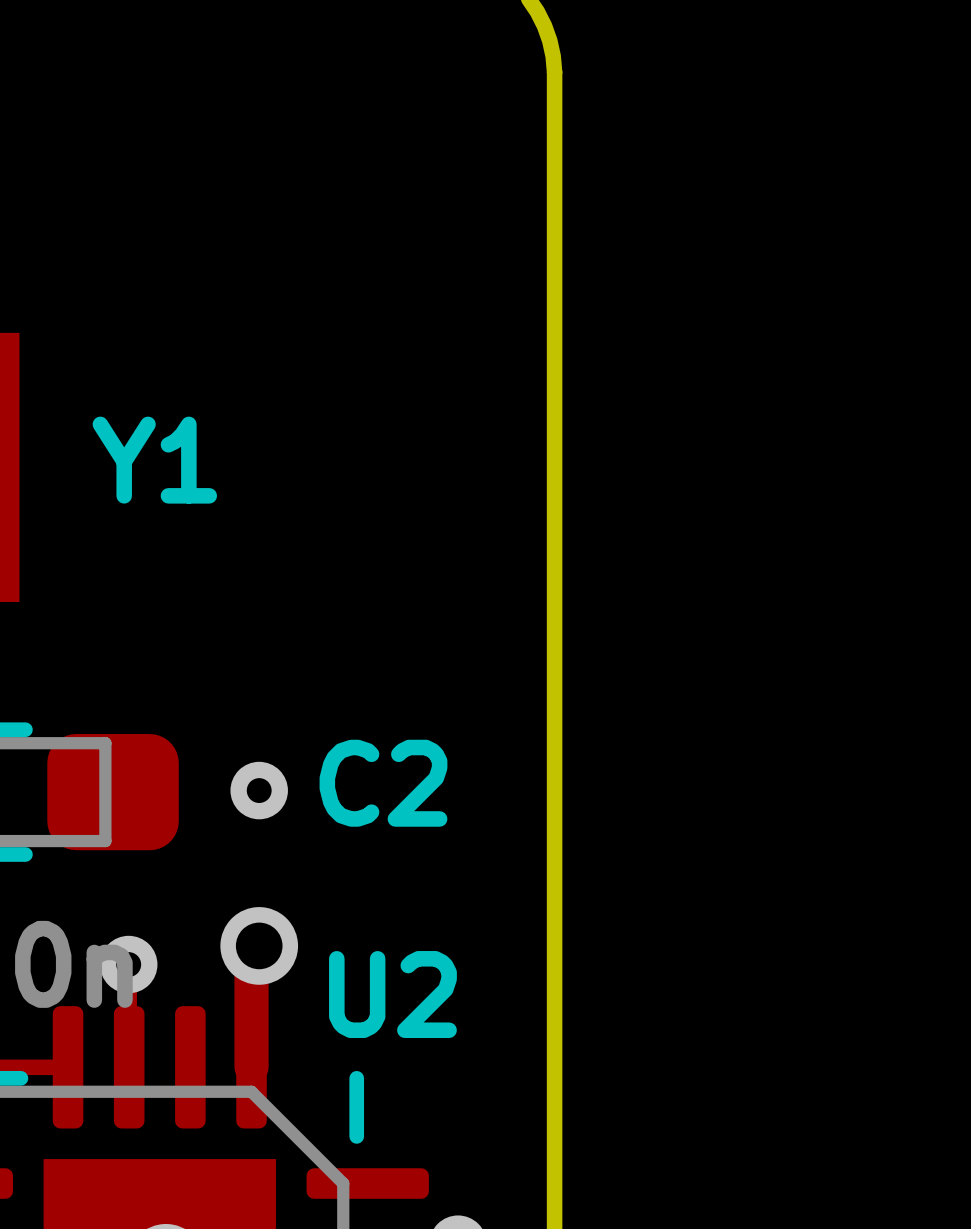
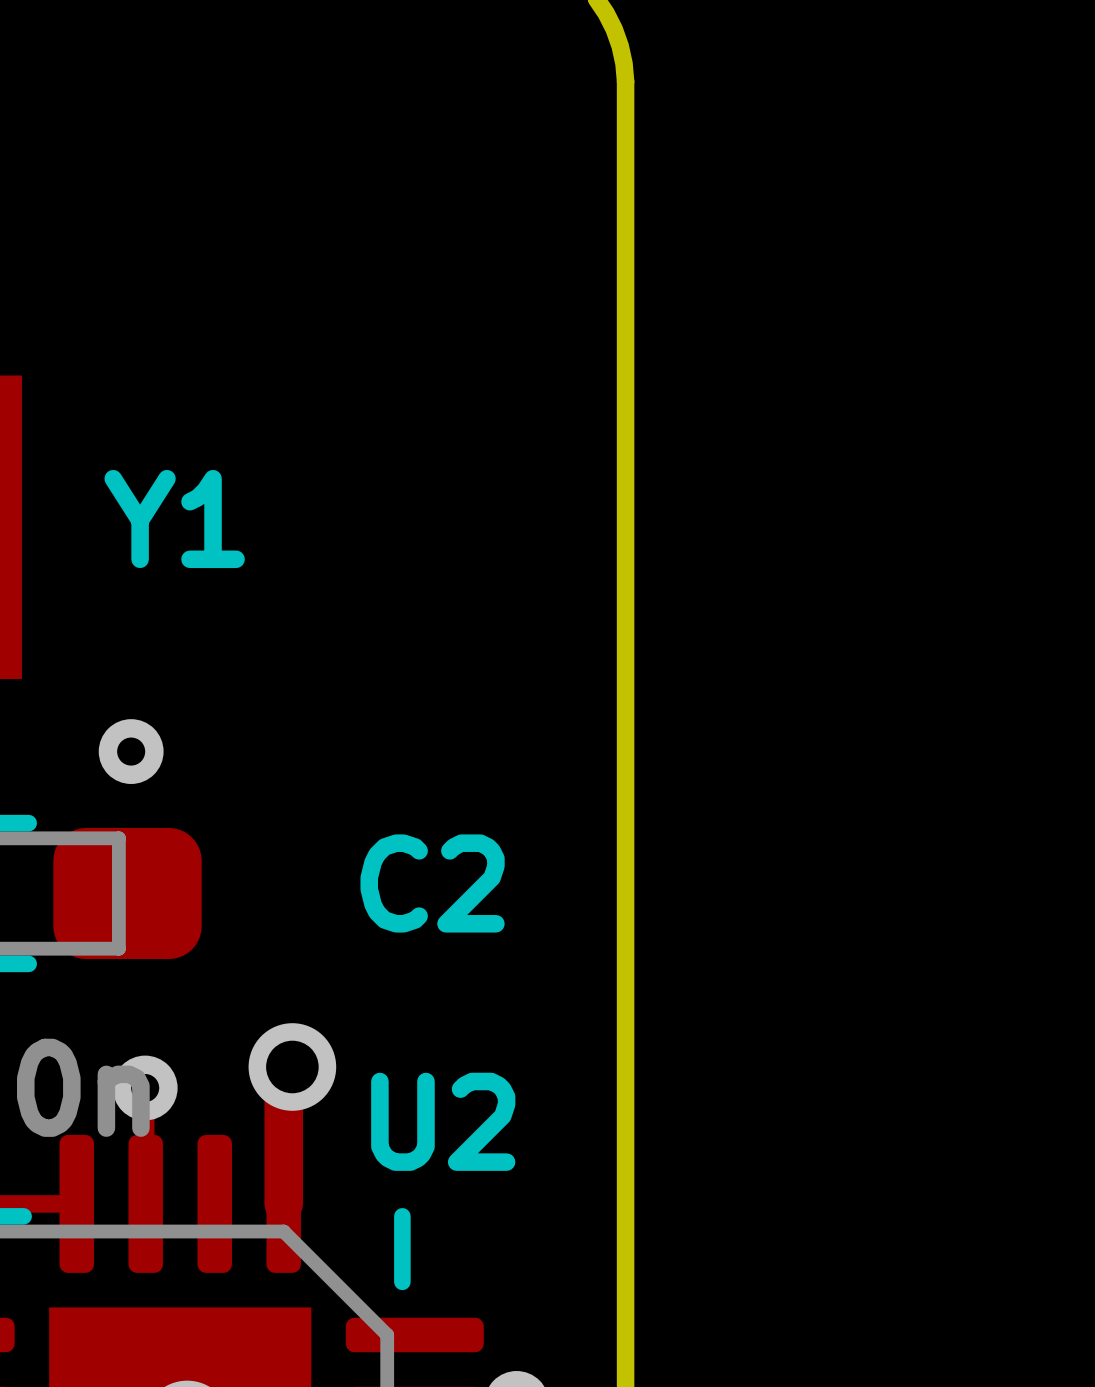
via position: (259, 790) -> (131, 751)

